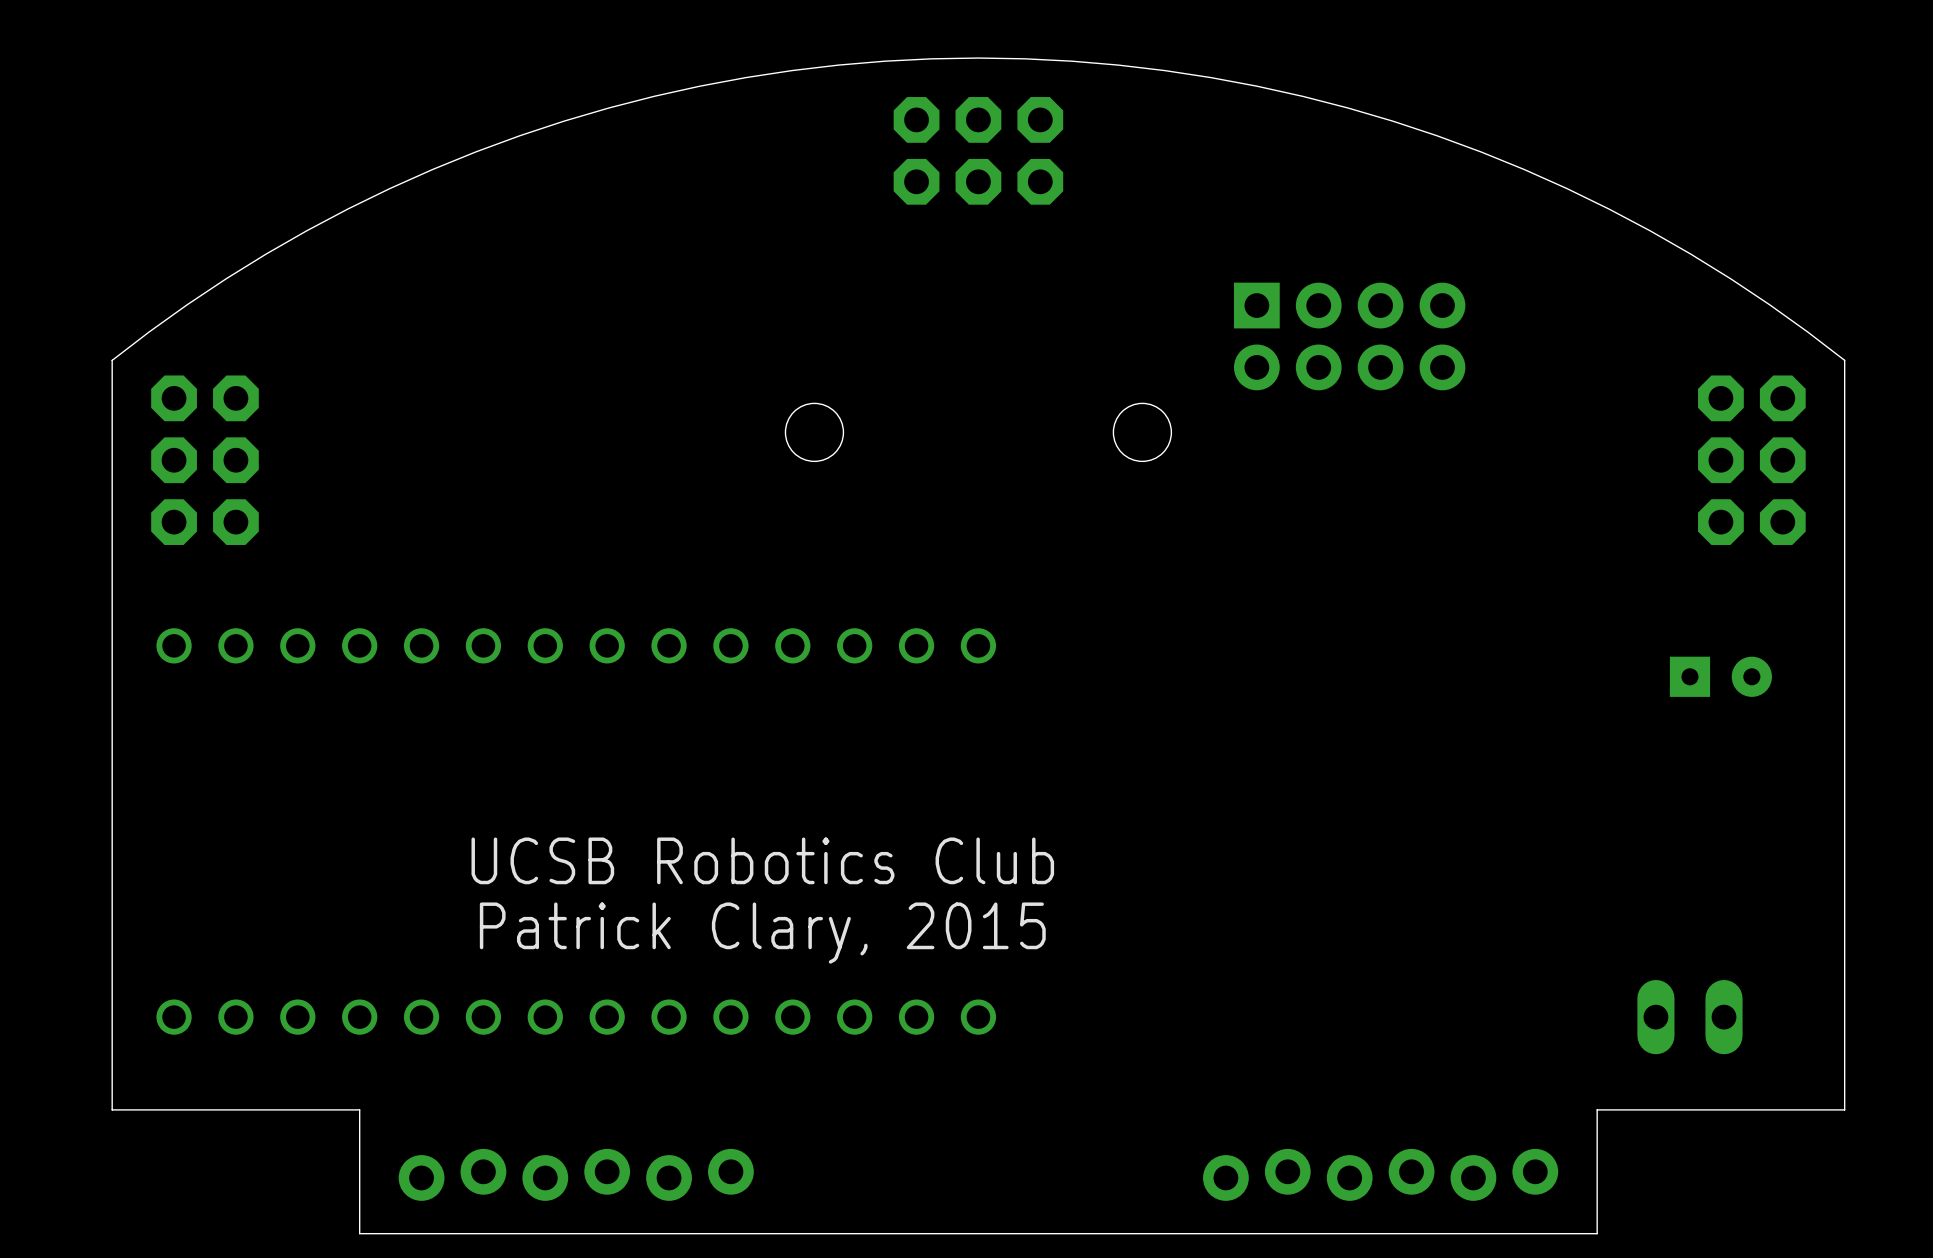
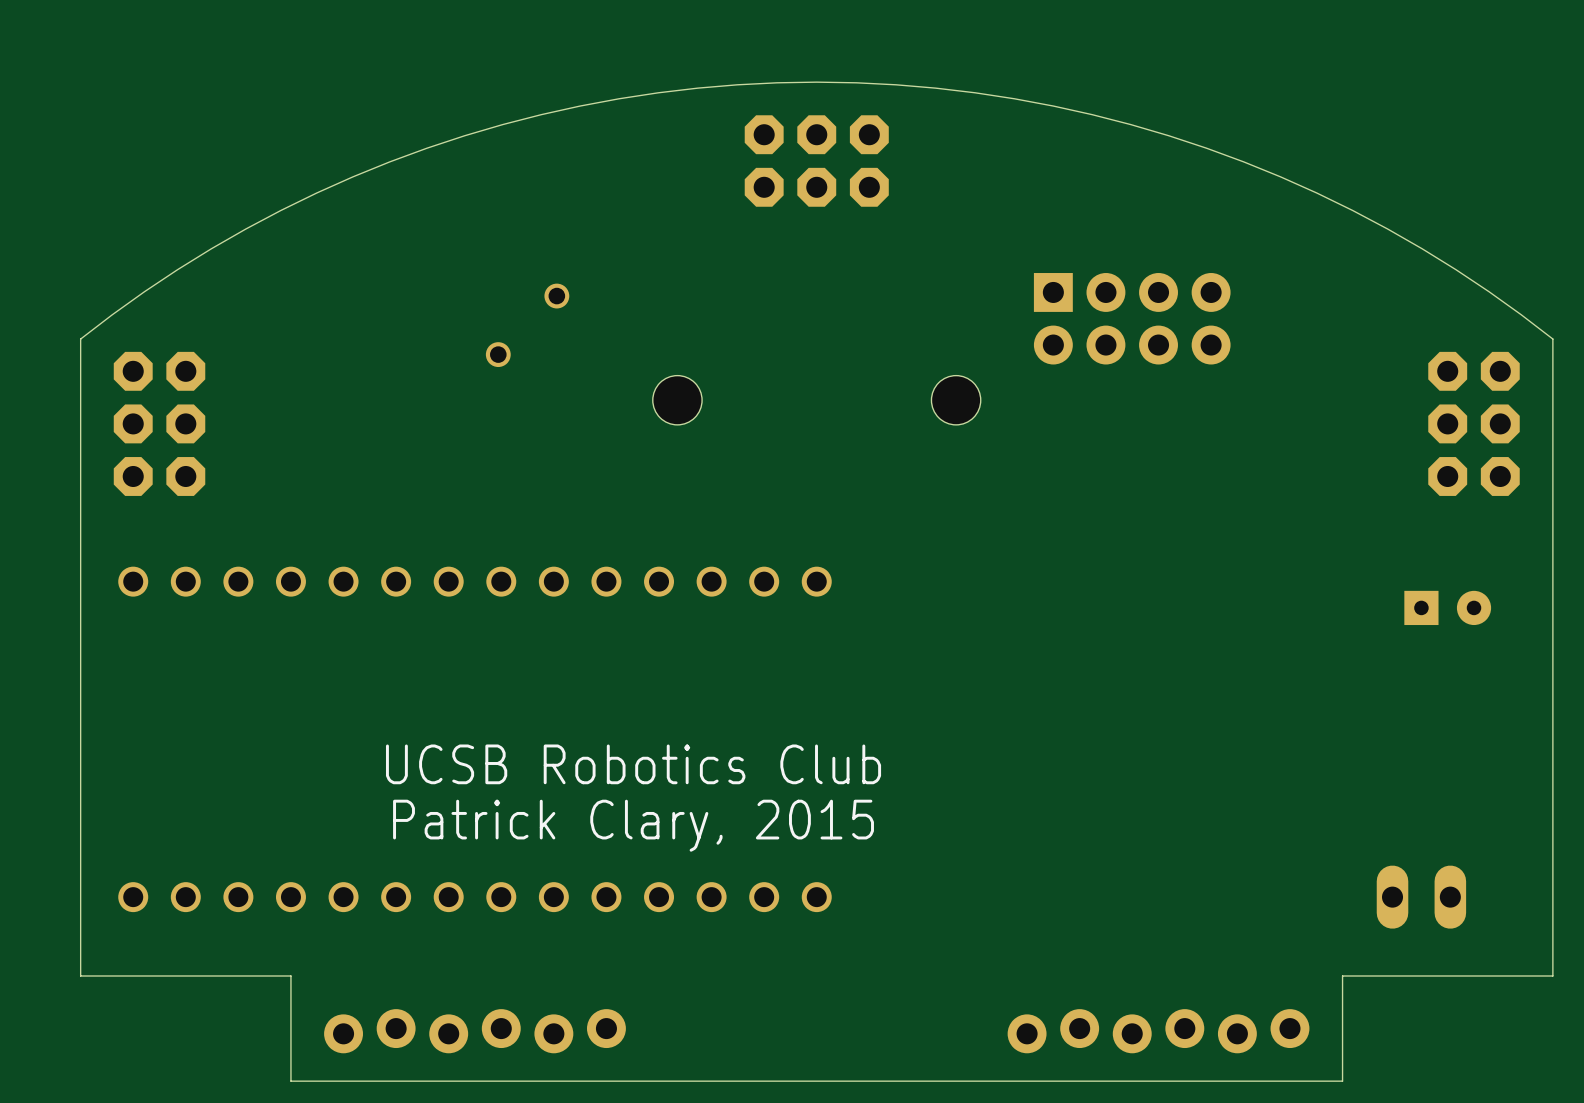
part: none -> (527, 325)

